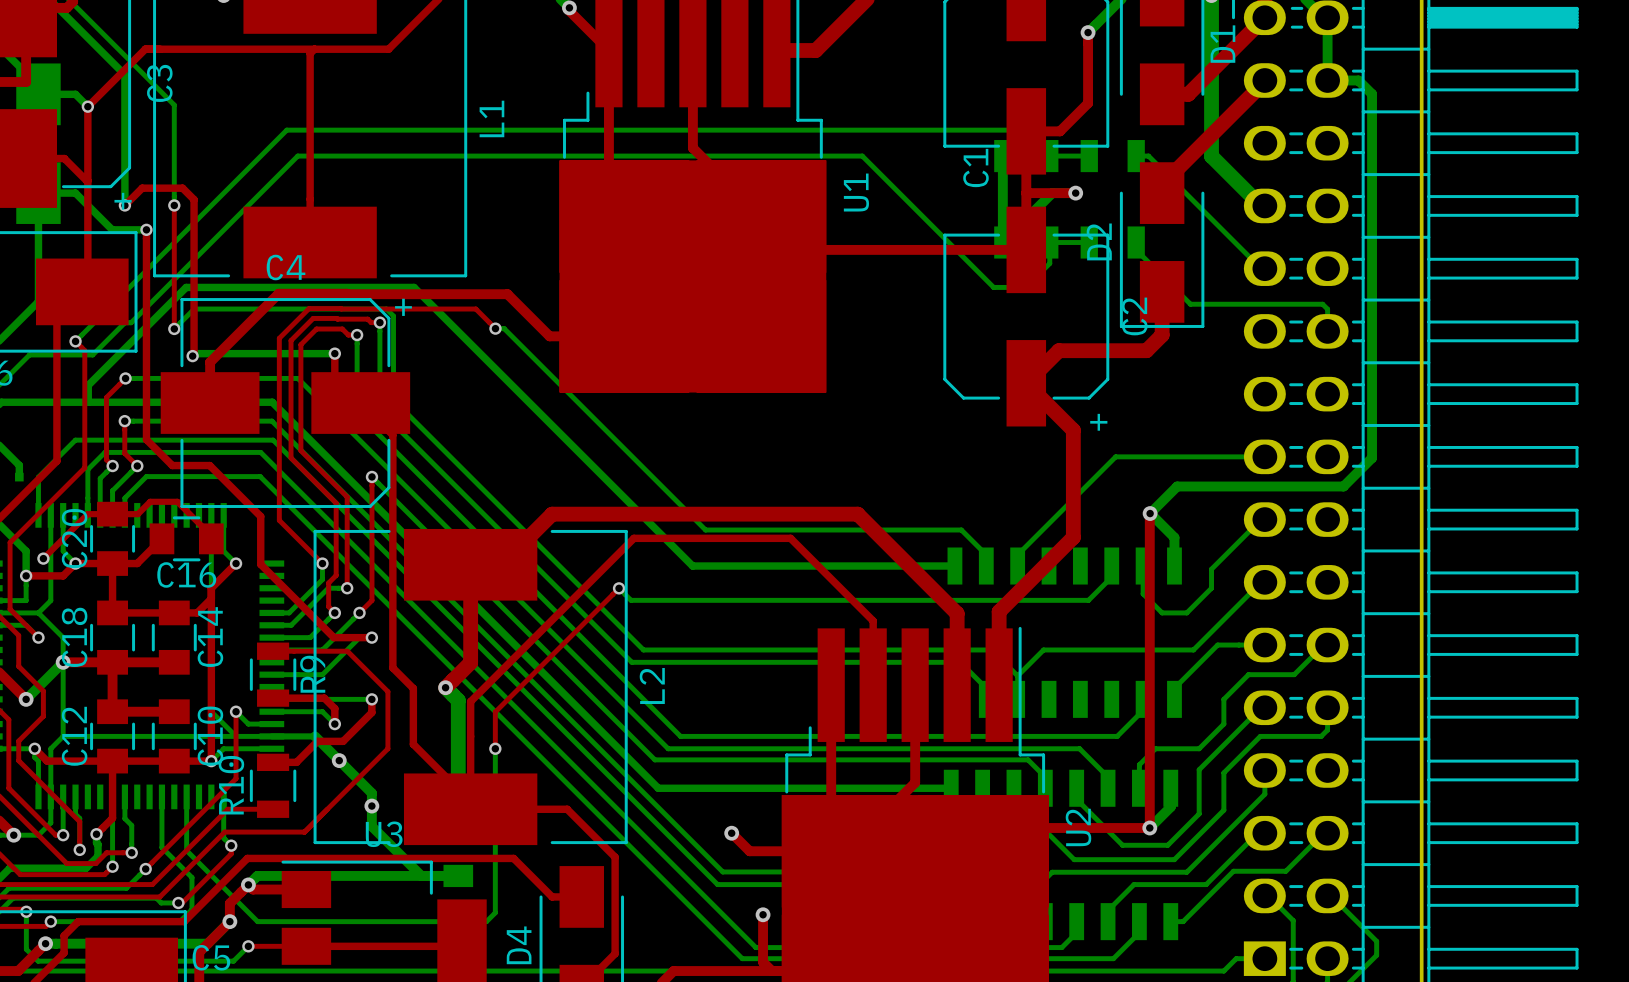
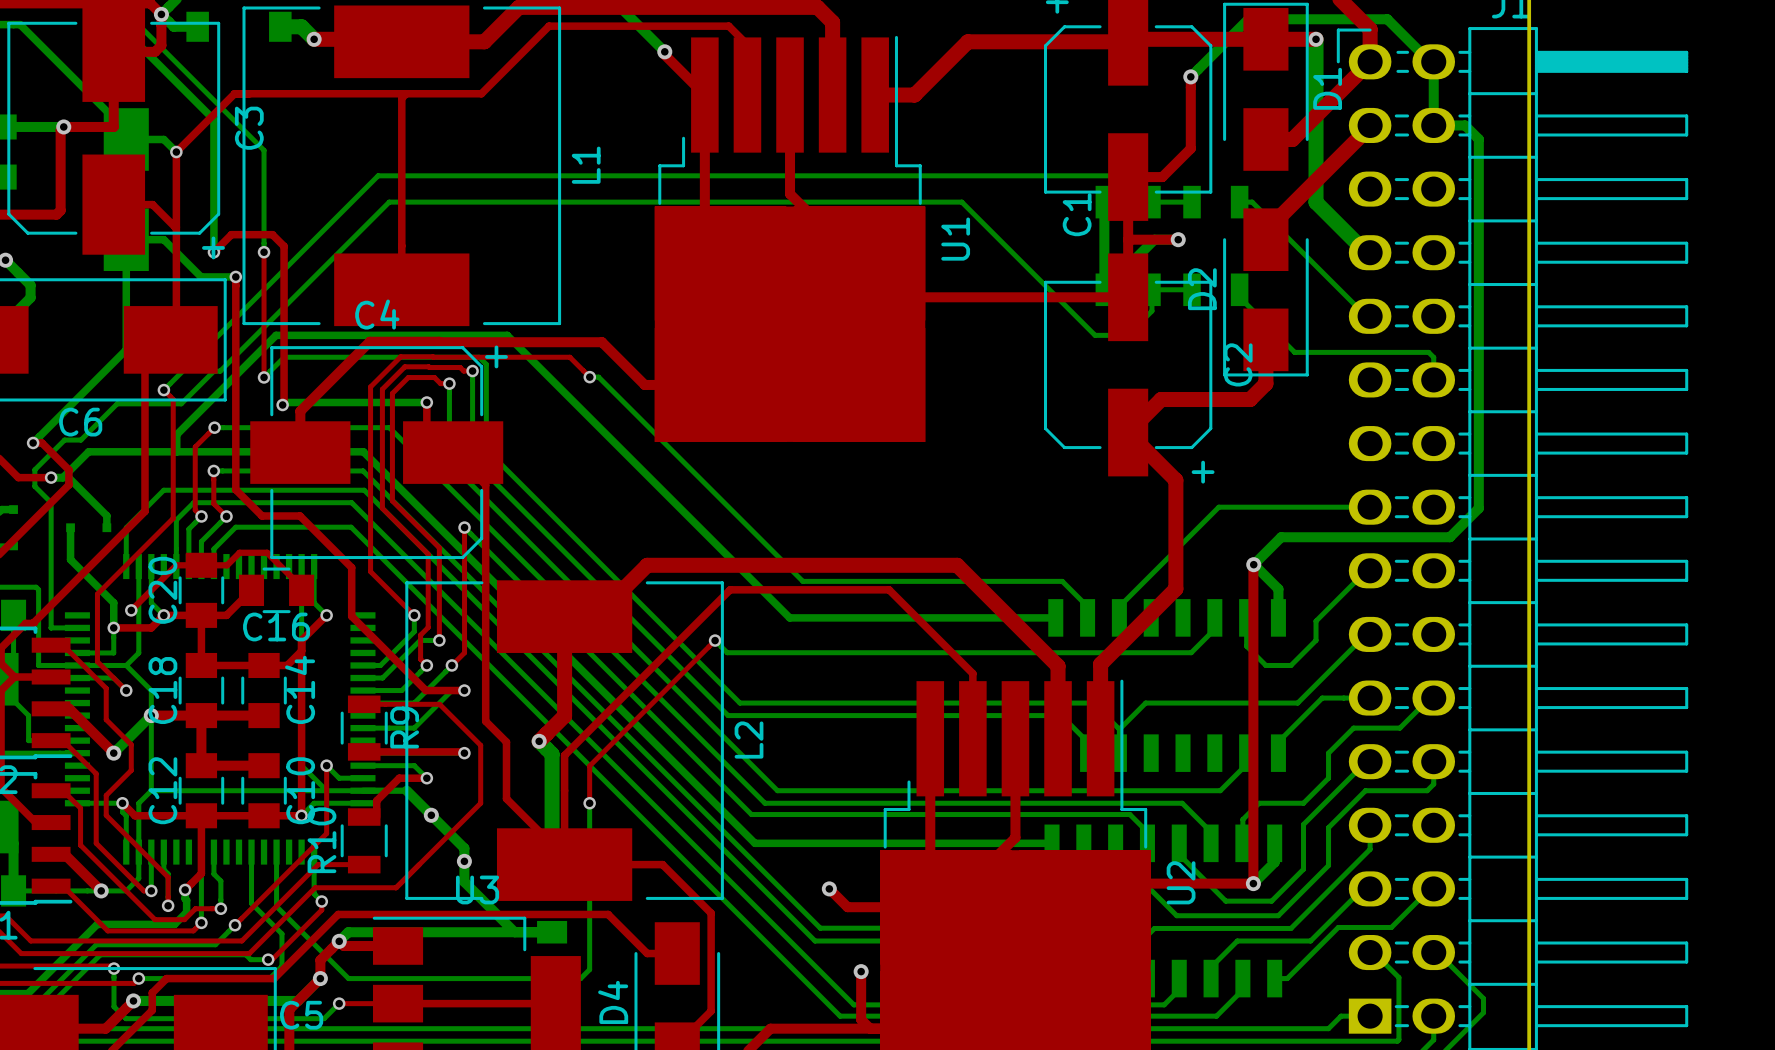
top track: (324, 698) (334, 708) (334, 724) -> (416, 751) (464, 753)
top track: (371, 699) (371, 712) (343, 741) (317, 741) (296, 762) (273, 762) -> none
top track: none -> (426, 778) (399, 778) (376, 800) (376, 817)

